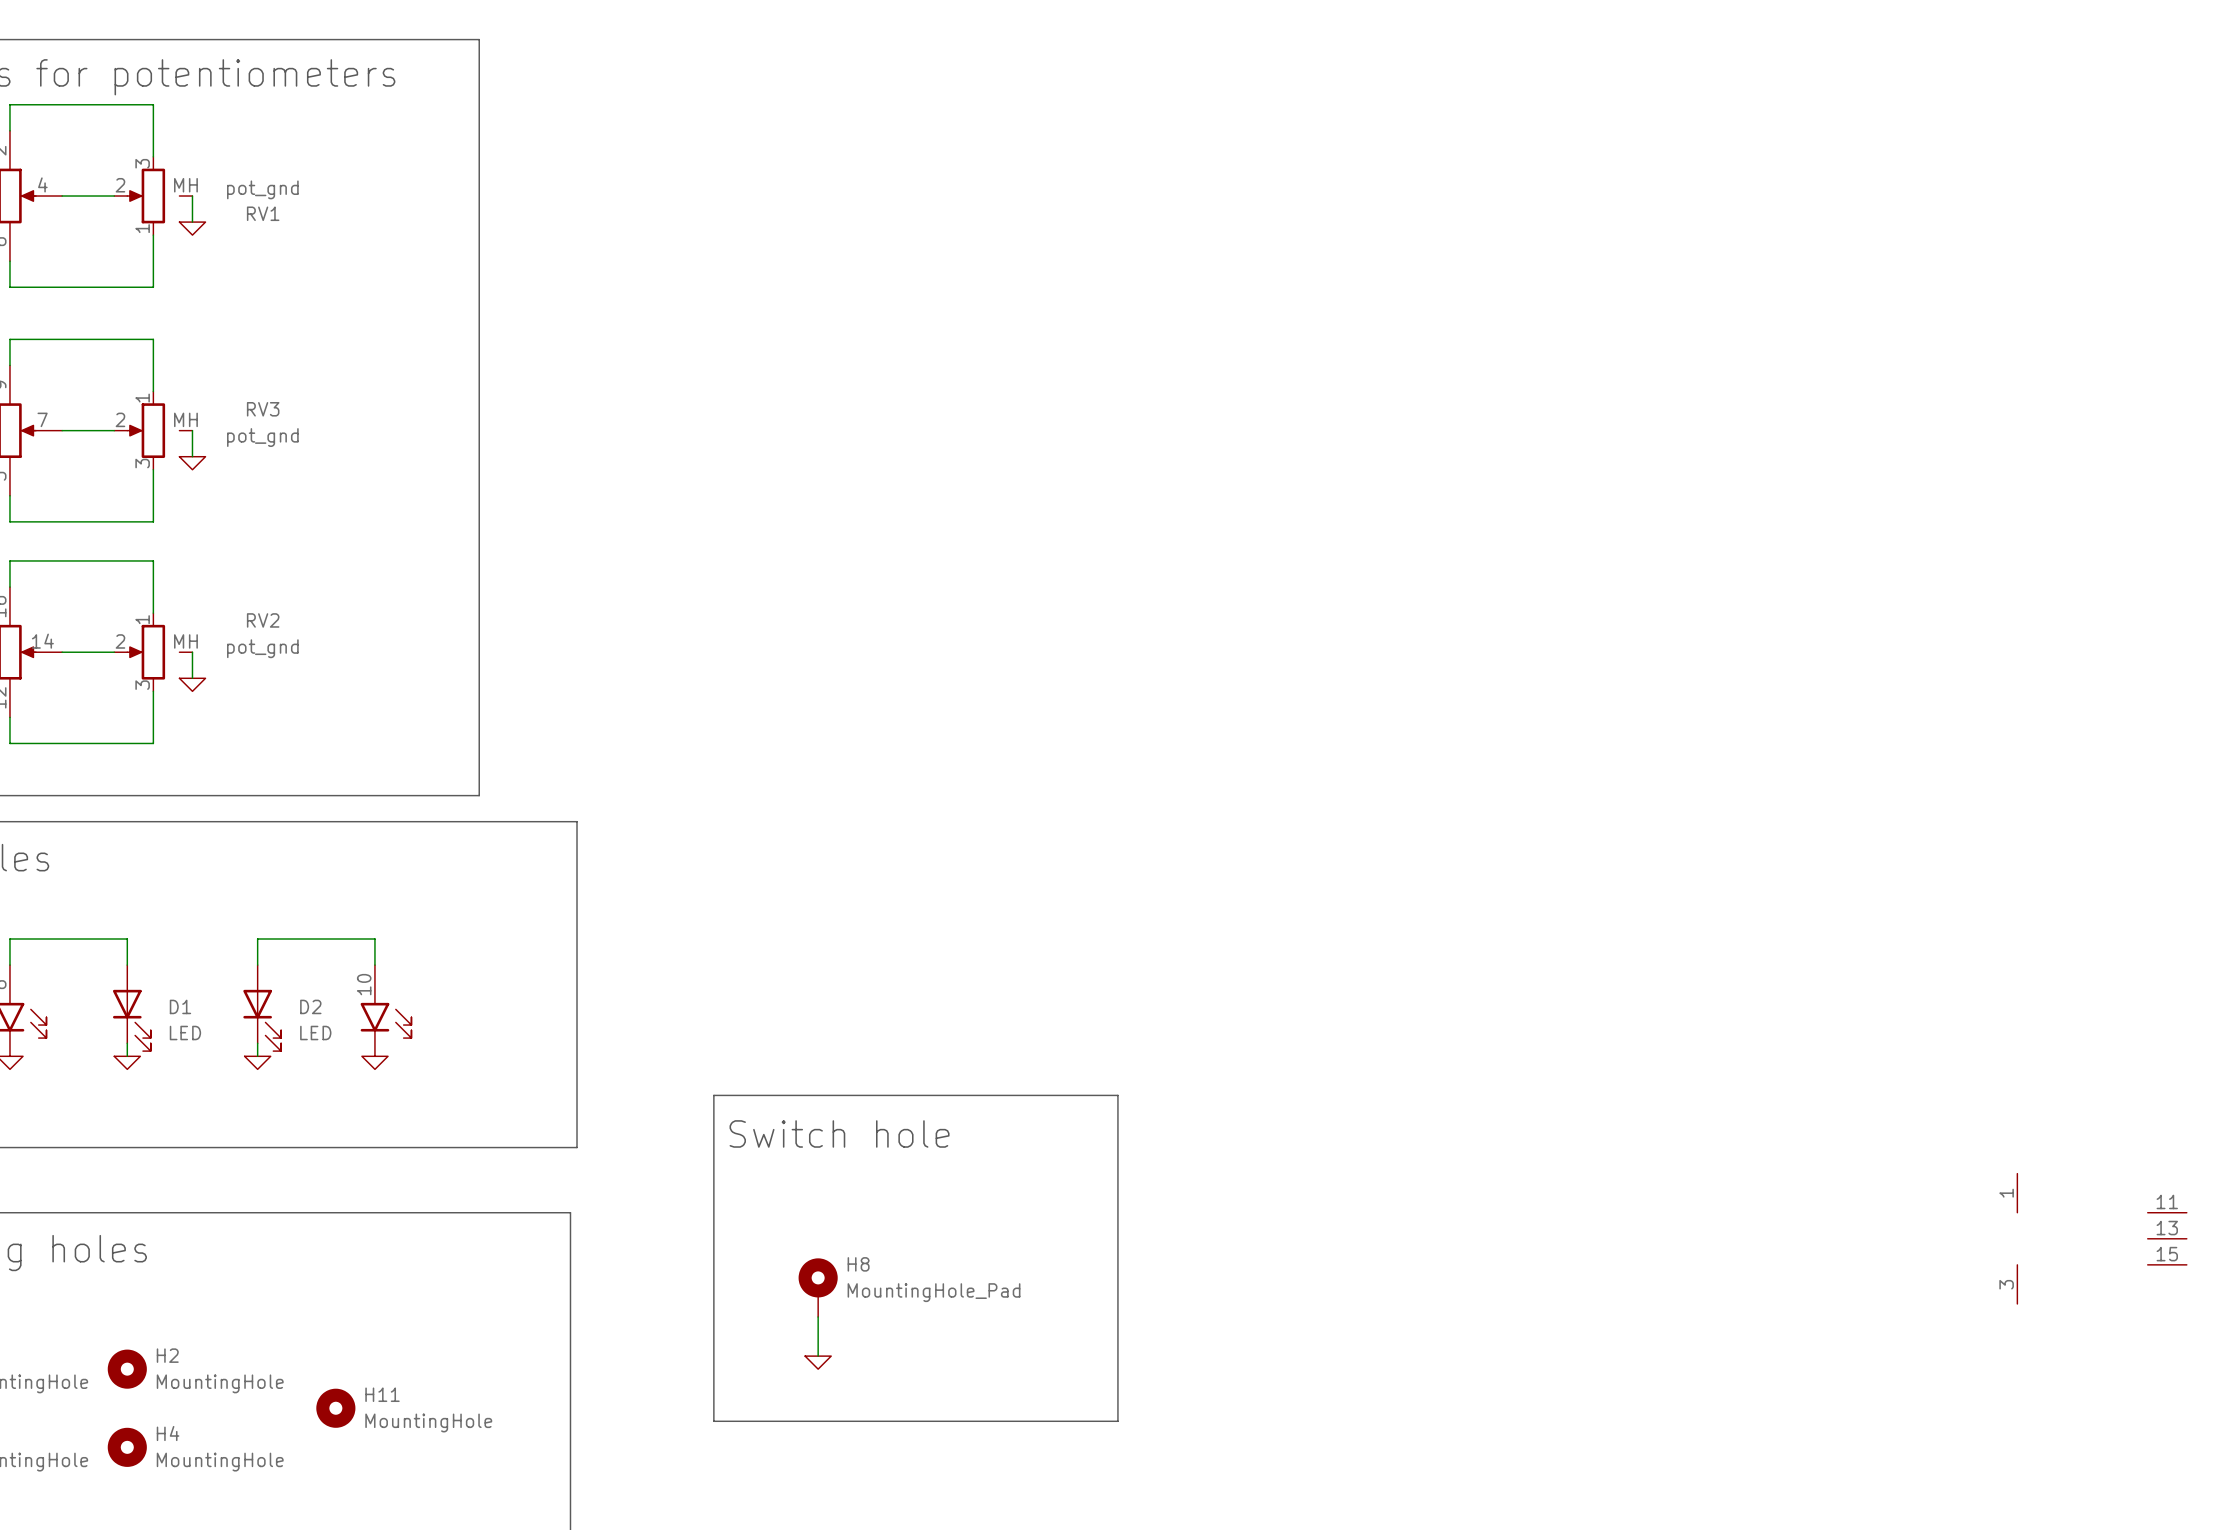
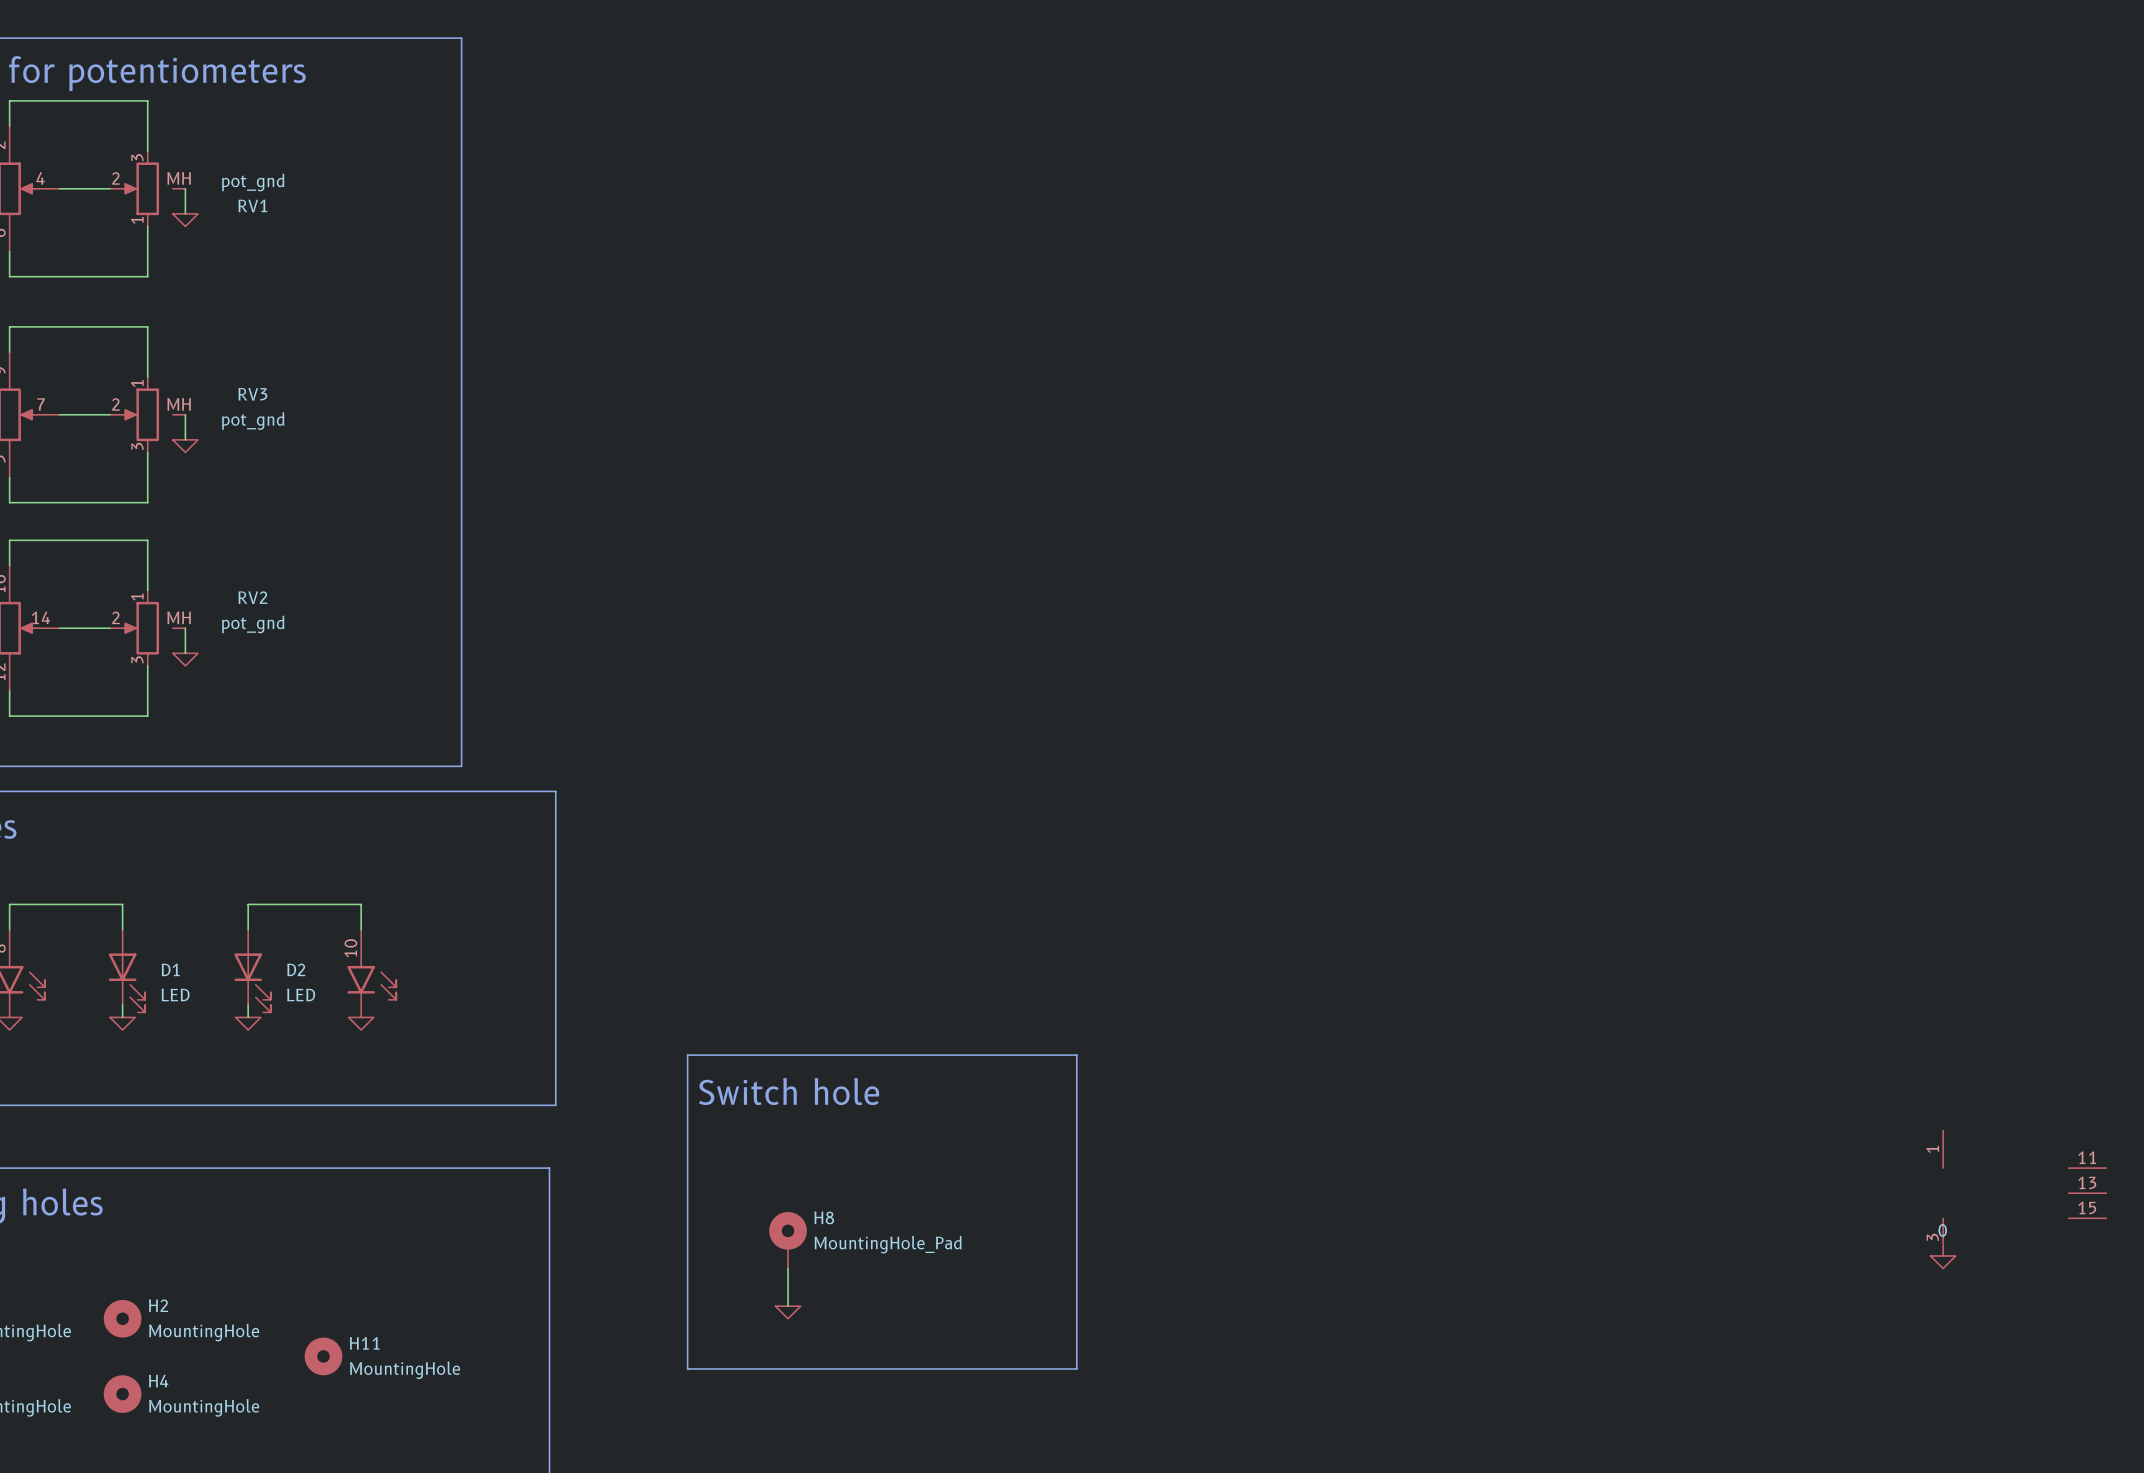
power symbol: none -> 0 (1943, 1262)

